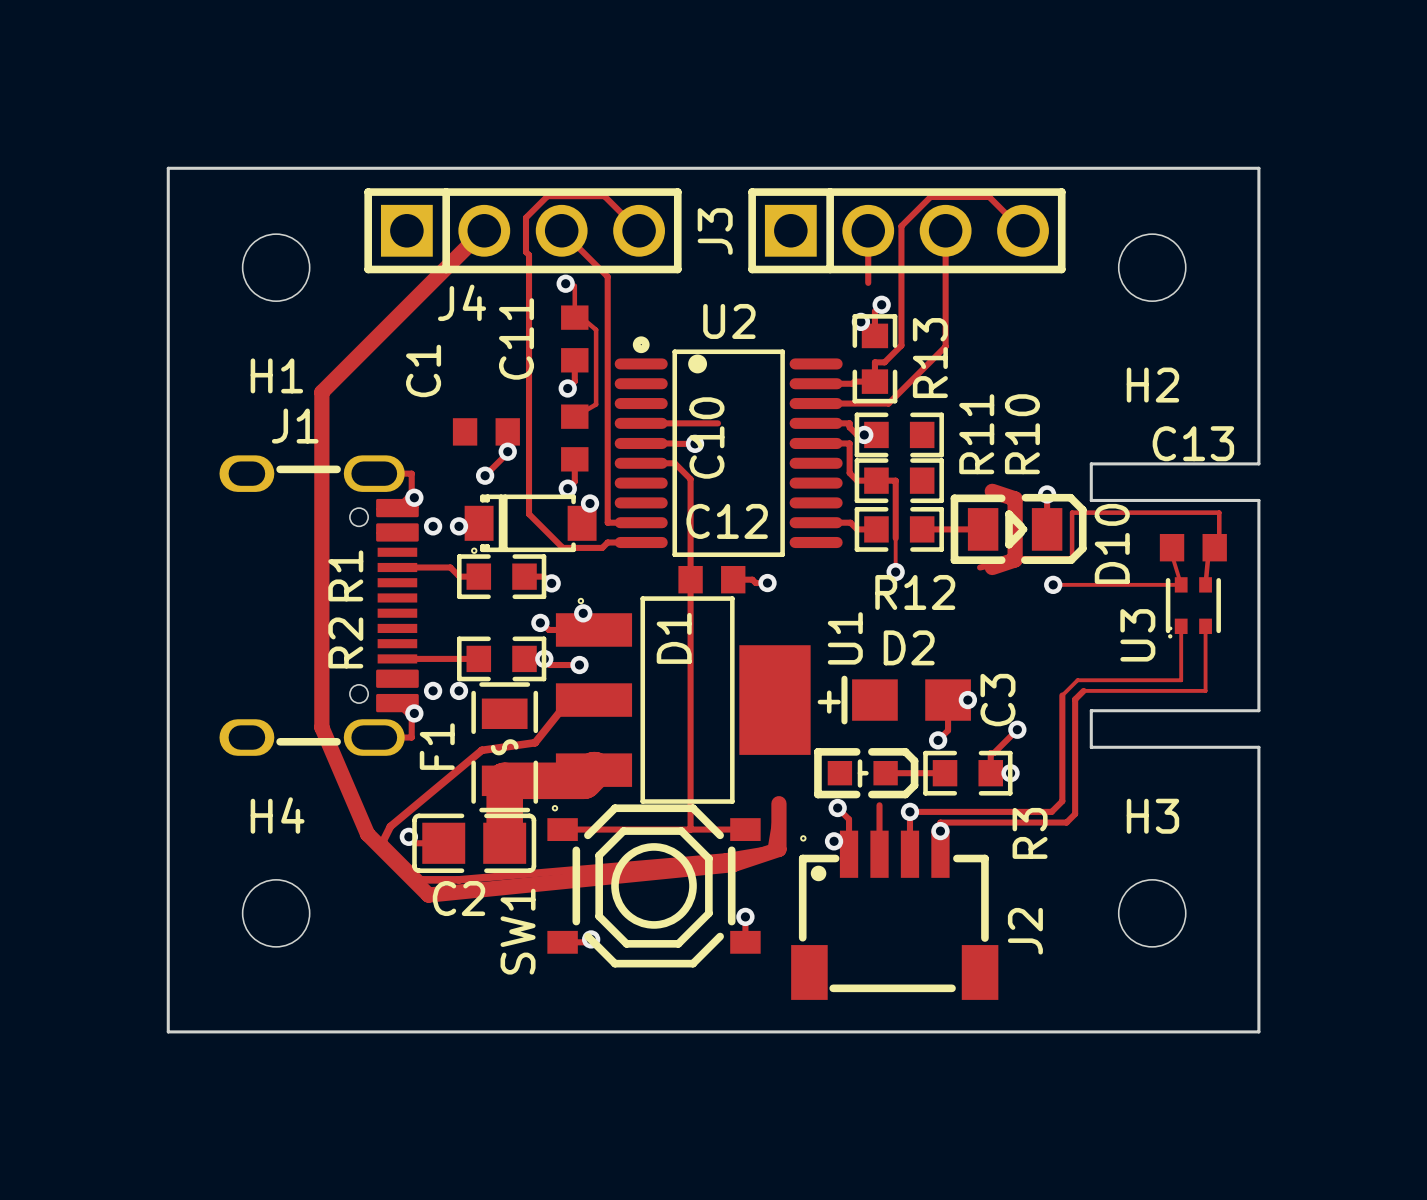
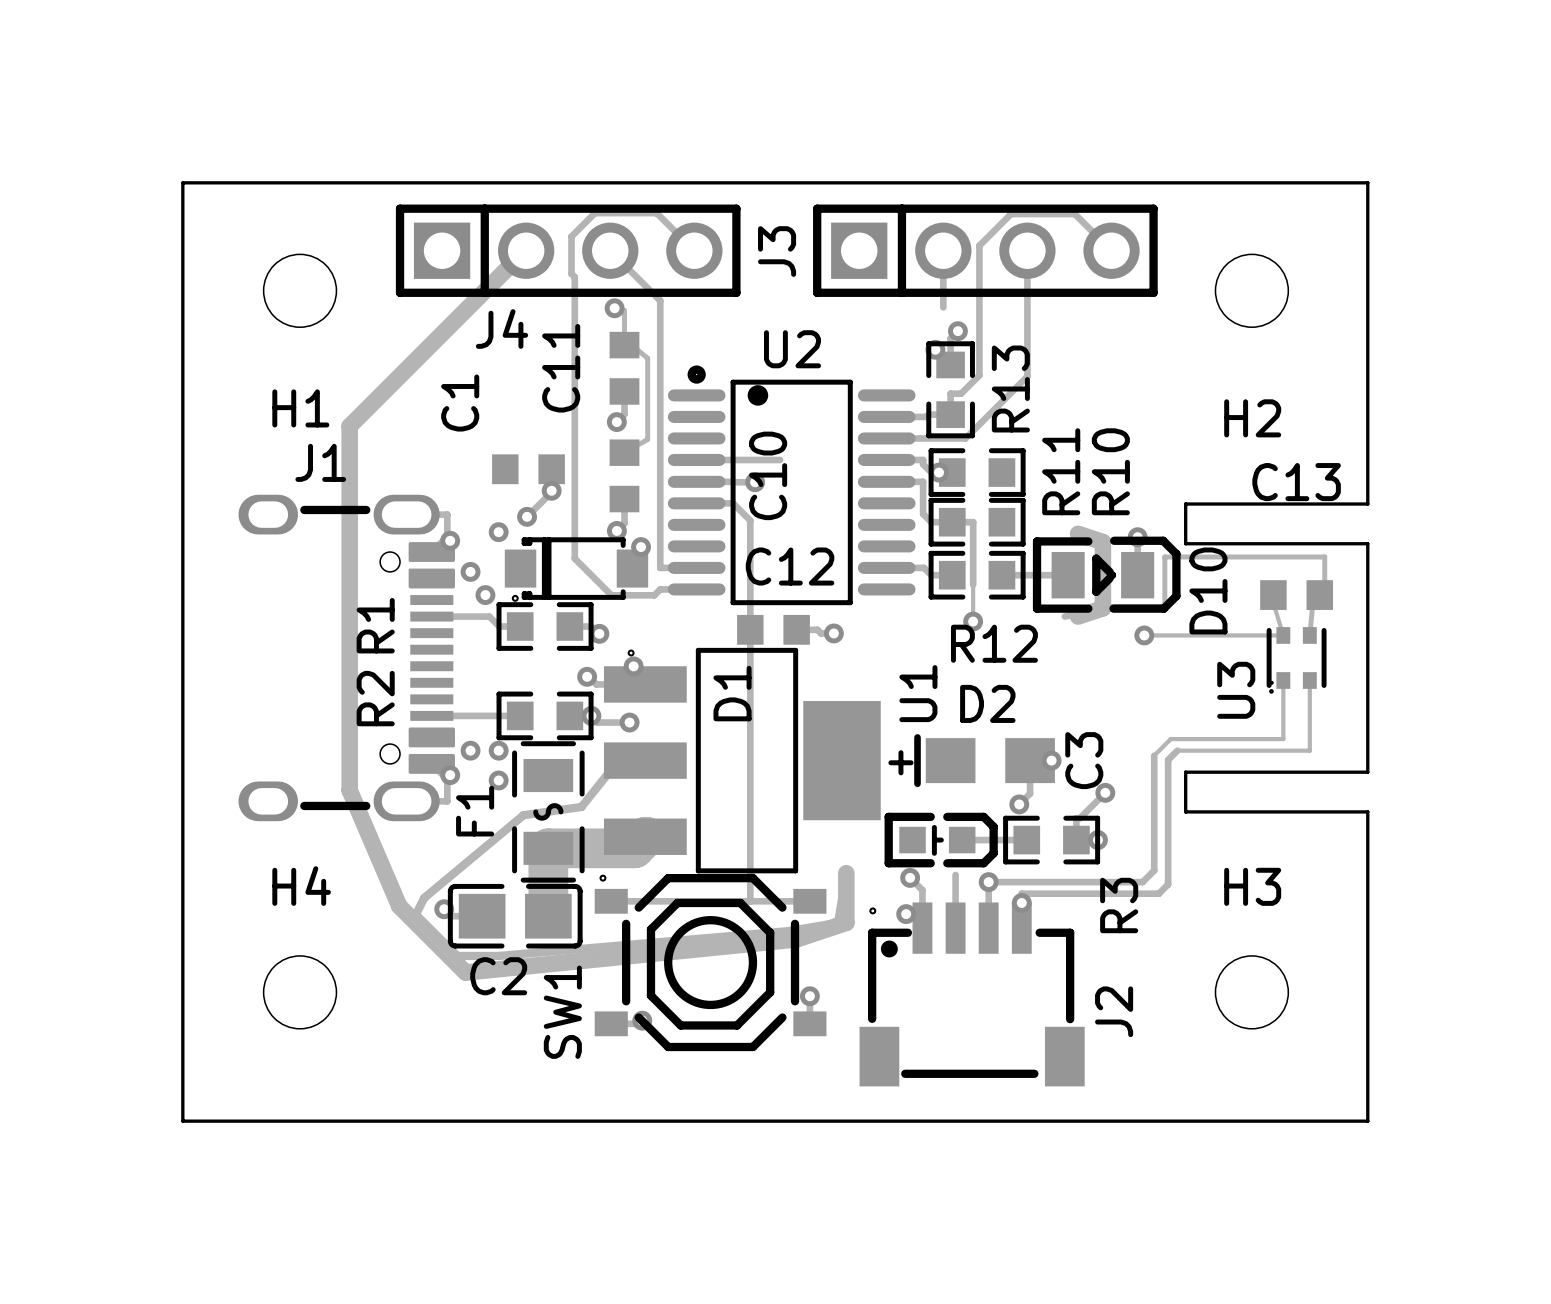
via: none -> (498, 532)
via: (458, 526) -> none
via: none -> (485, 595)
via: none -> (498, 780)

